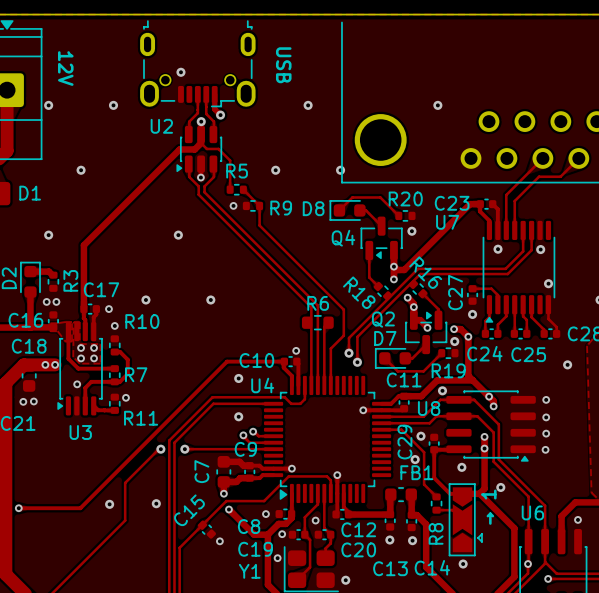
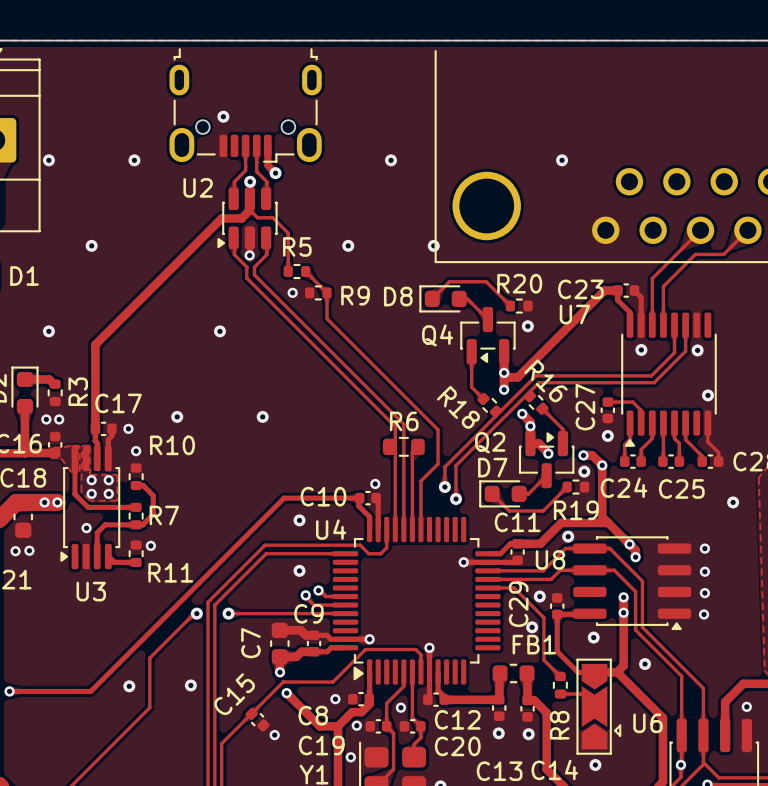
text: USB (283, 65) -> none
text: 12V (65, 68) -> none
text: → 1 (488, 507) -> none
U6 name position: U6 (532, 512) -> U6 (648, 723)

